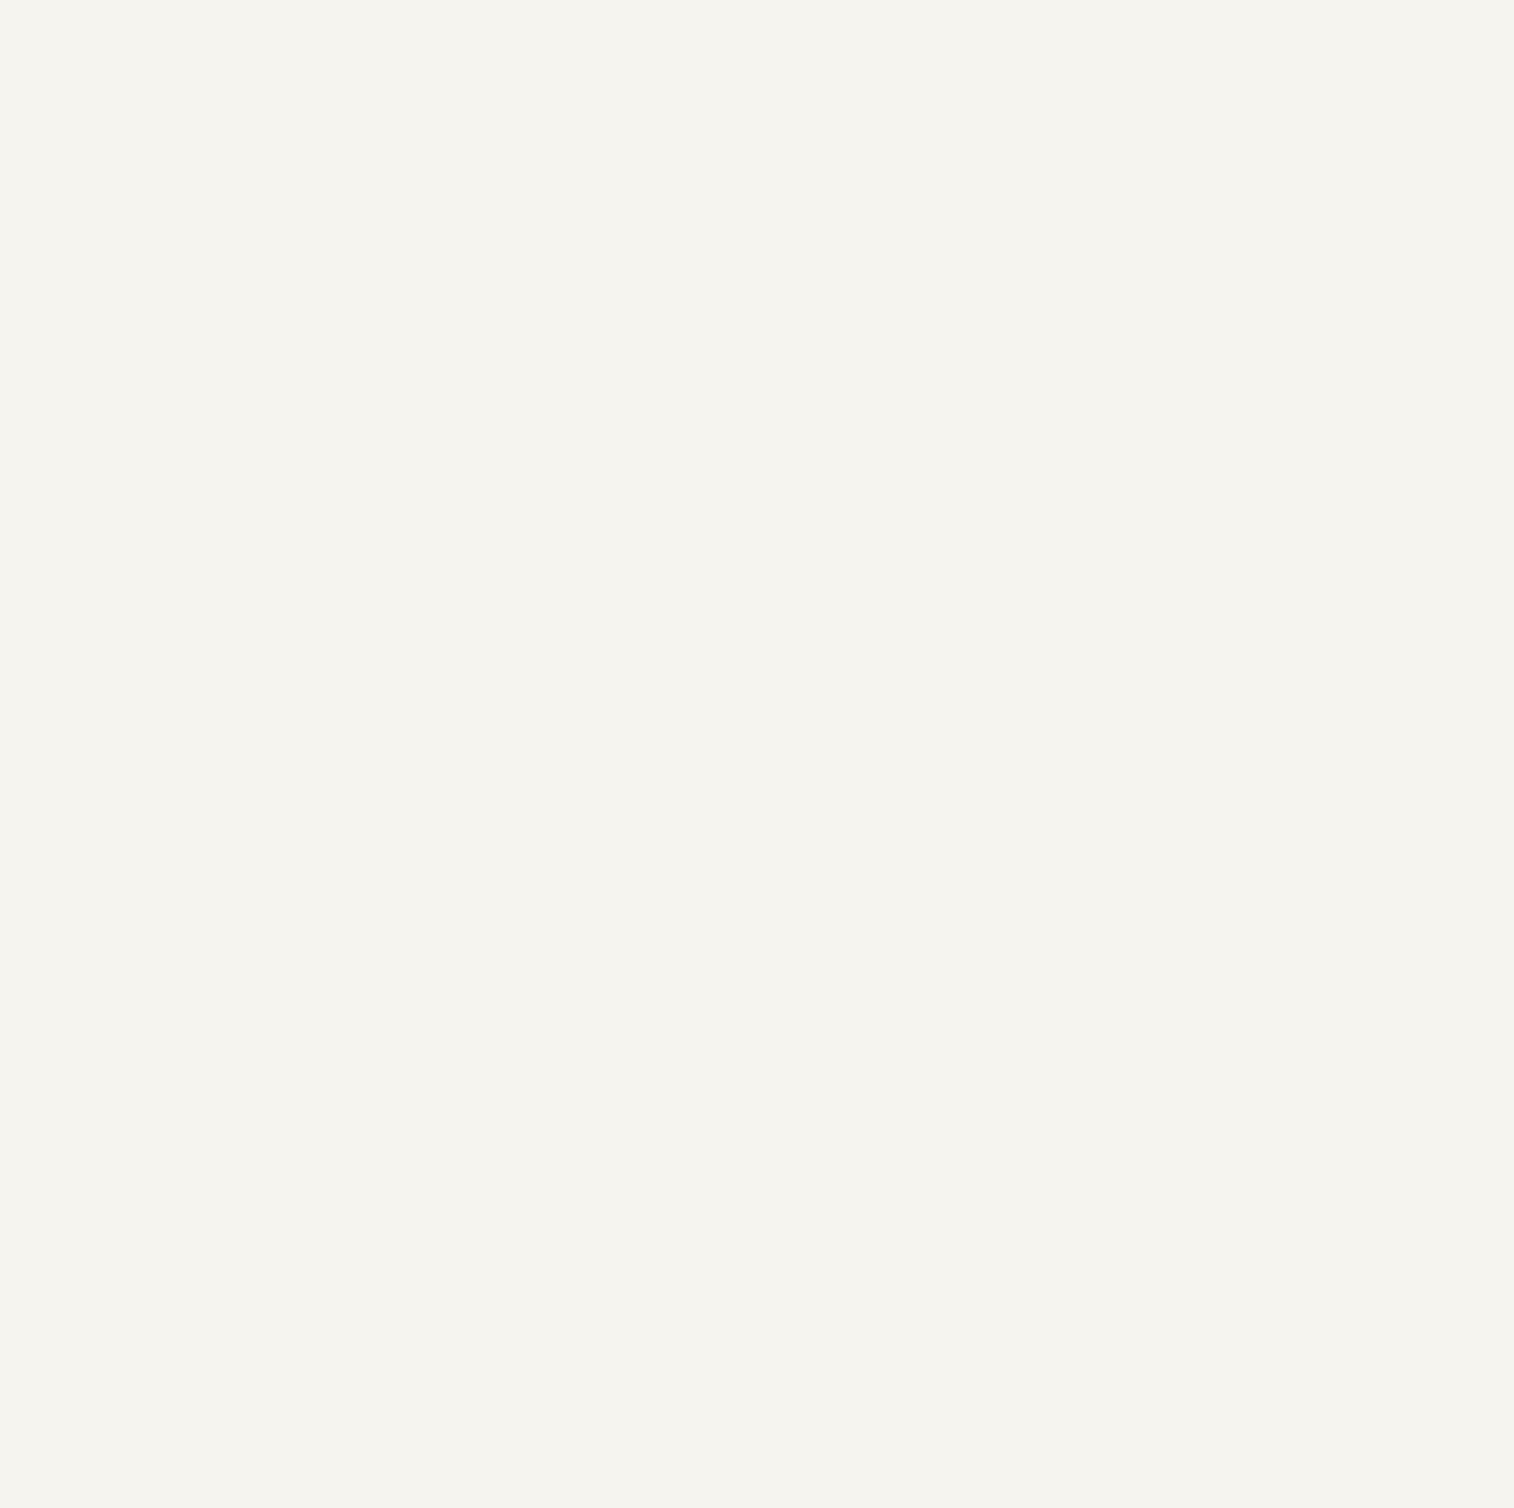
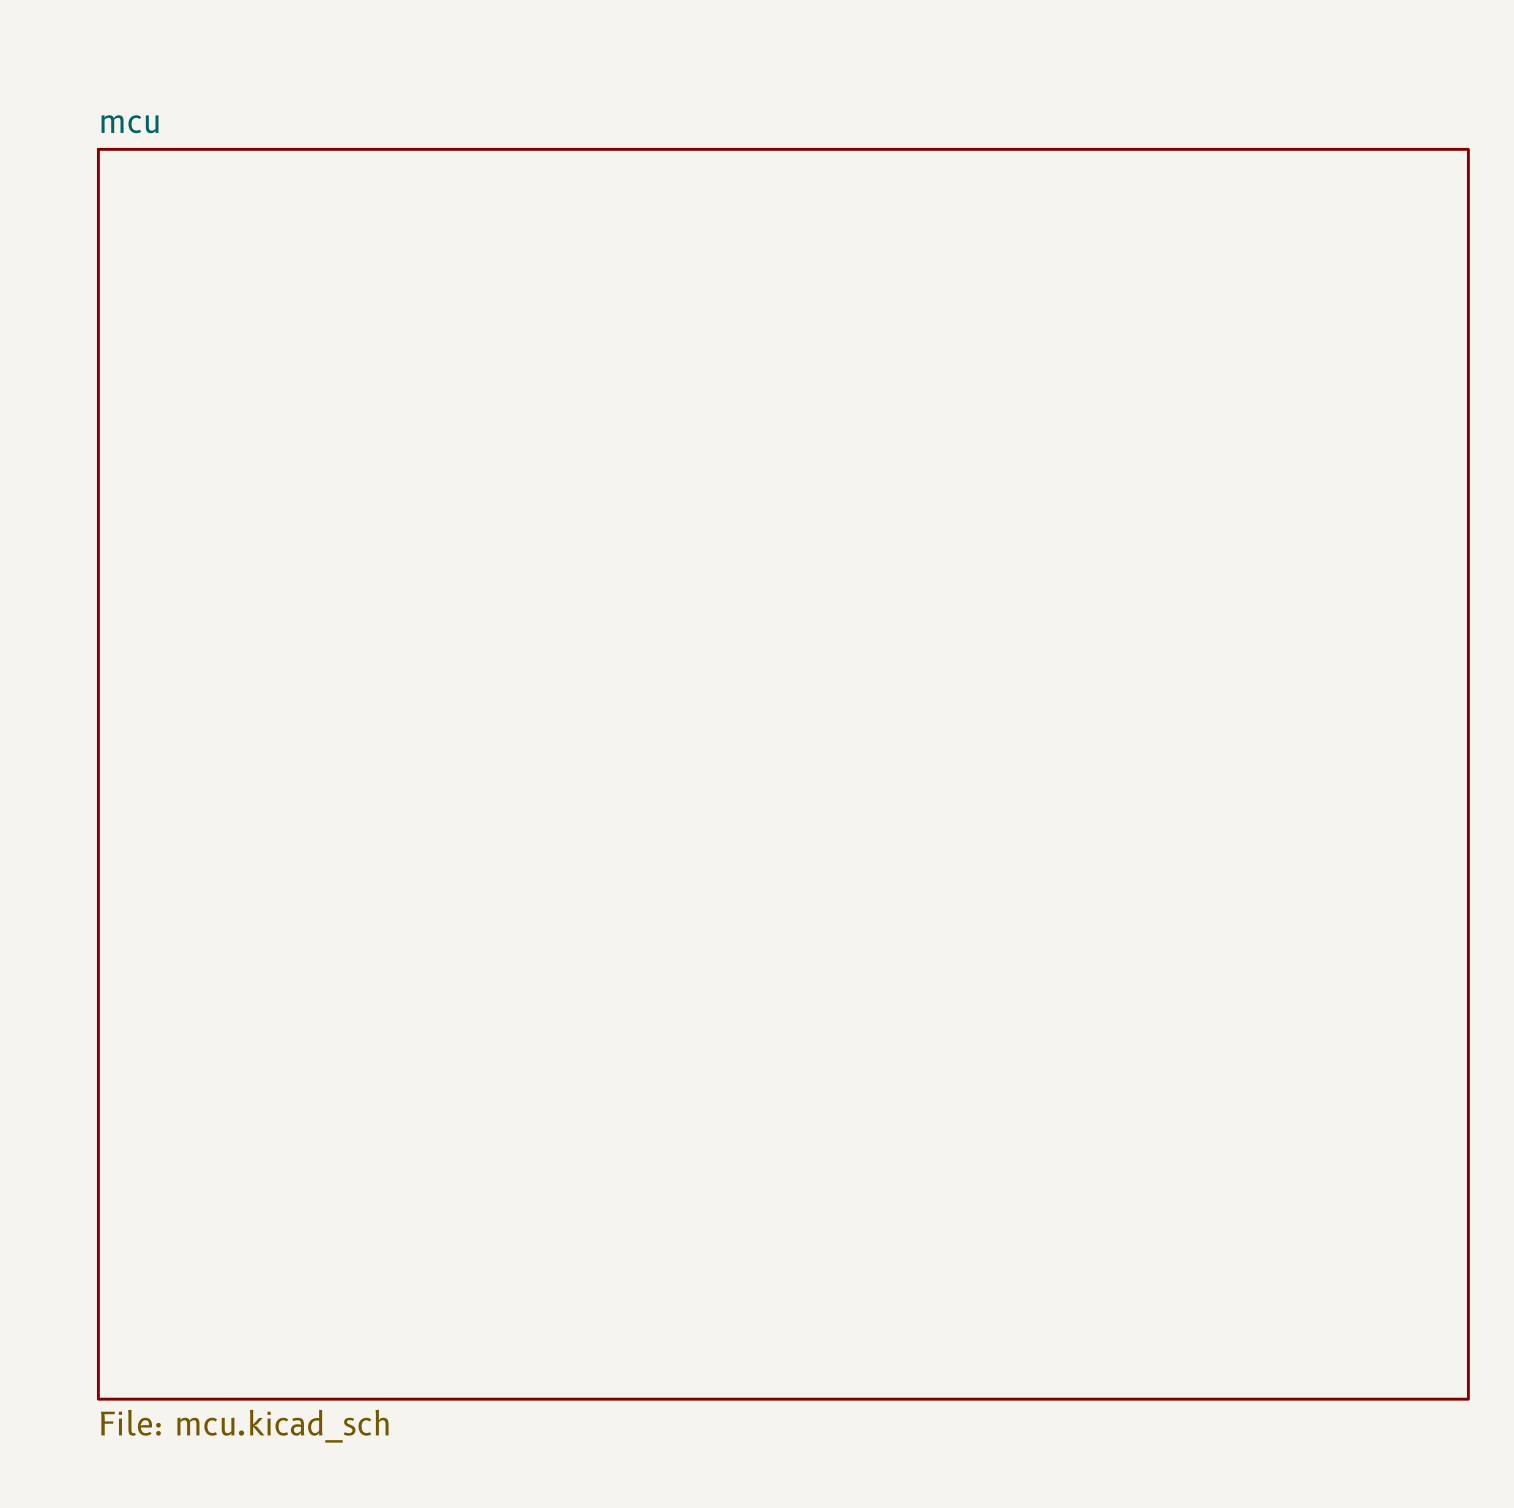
sheet mcu: none -> File: mcu.kicad_sch (783, 774)

